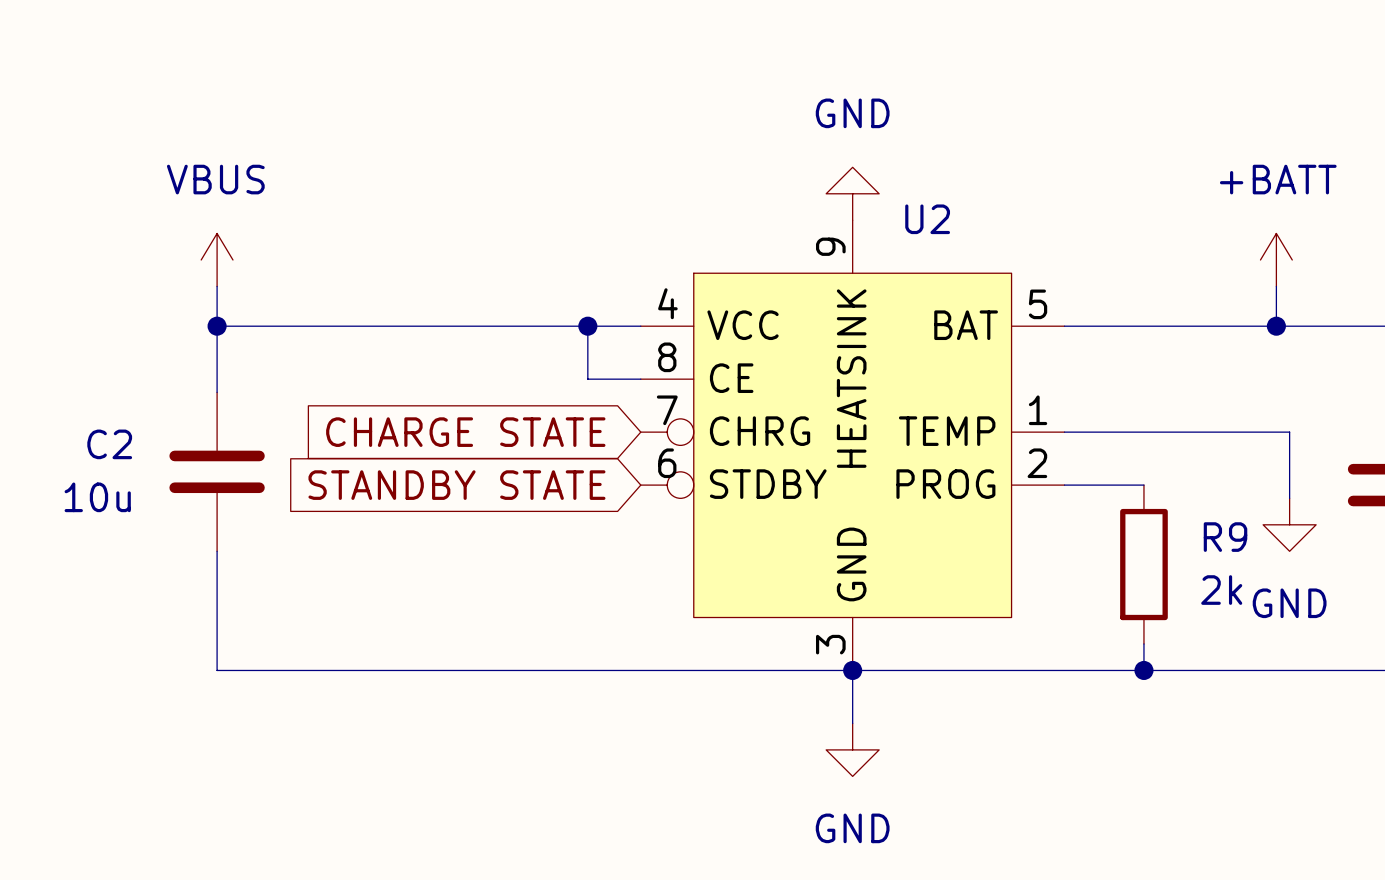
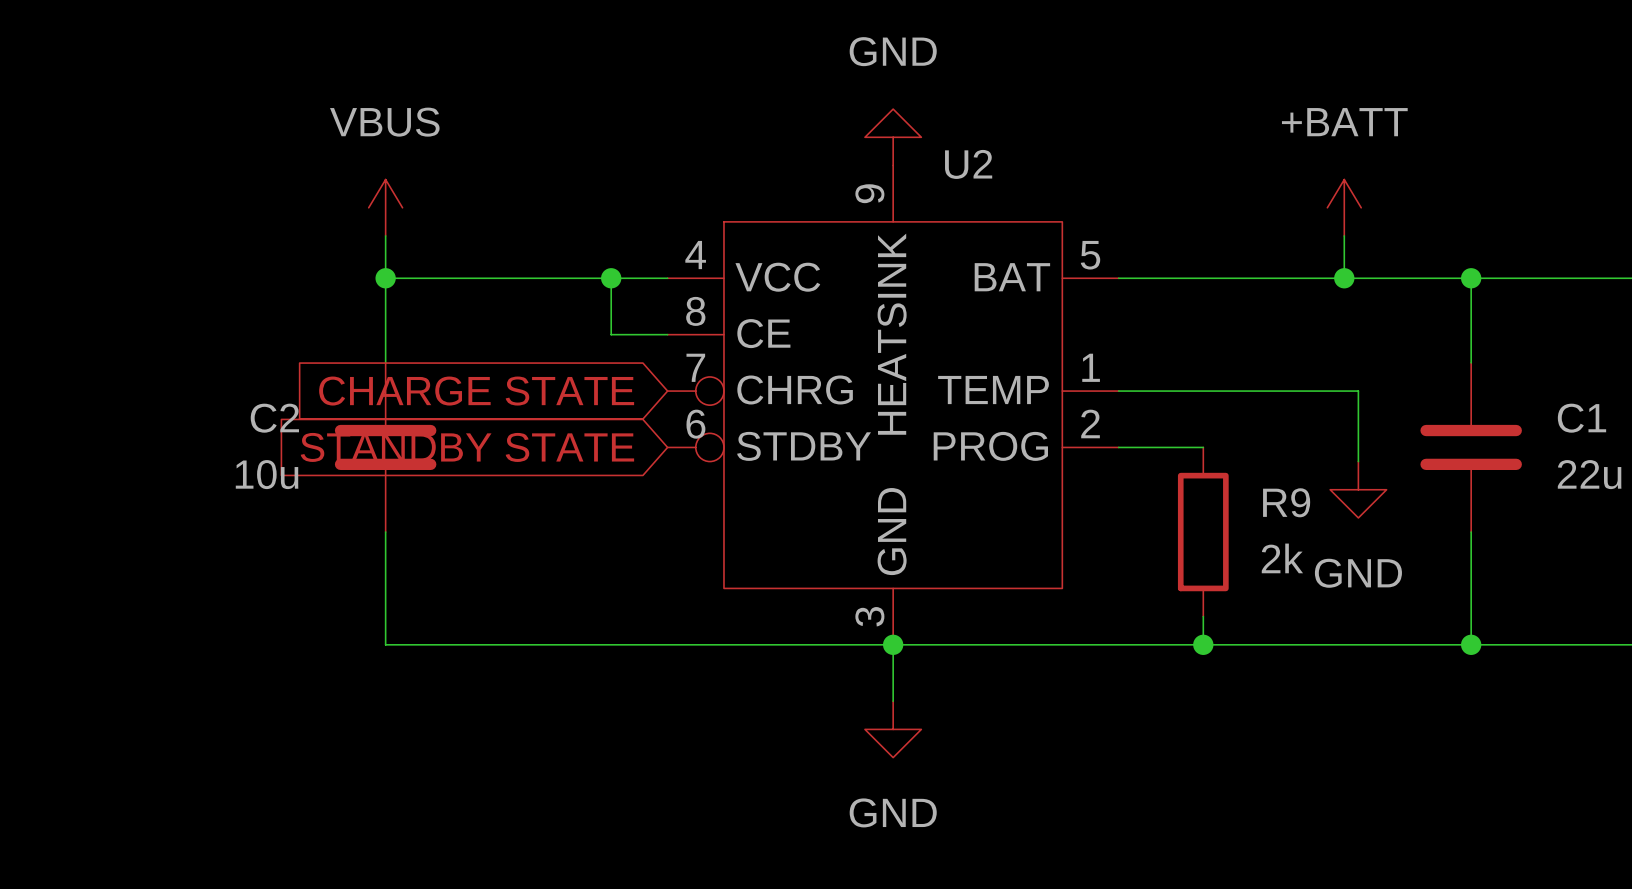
power symbol position: VBUS (217, 259) -> VBUS (385, 207)
wire: (217, 286) (217, 392) -> none
wire: none -> (385, 235) (385, 362)
wire: (217, 326) (375, 326) -> none
junction: (217, 326) -> none
junction: none -> (385, 278)
C2 position: (217, 471) -> (385, 447)
wire: (217, 551) (217, 670) (375, 670) -> (385, 532) (385, 644)

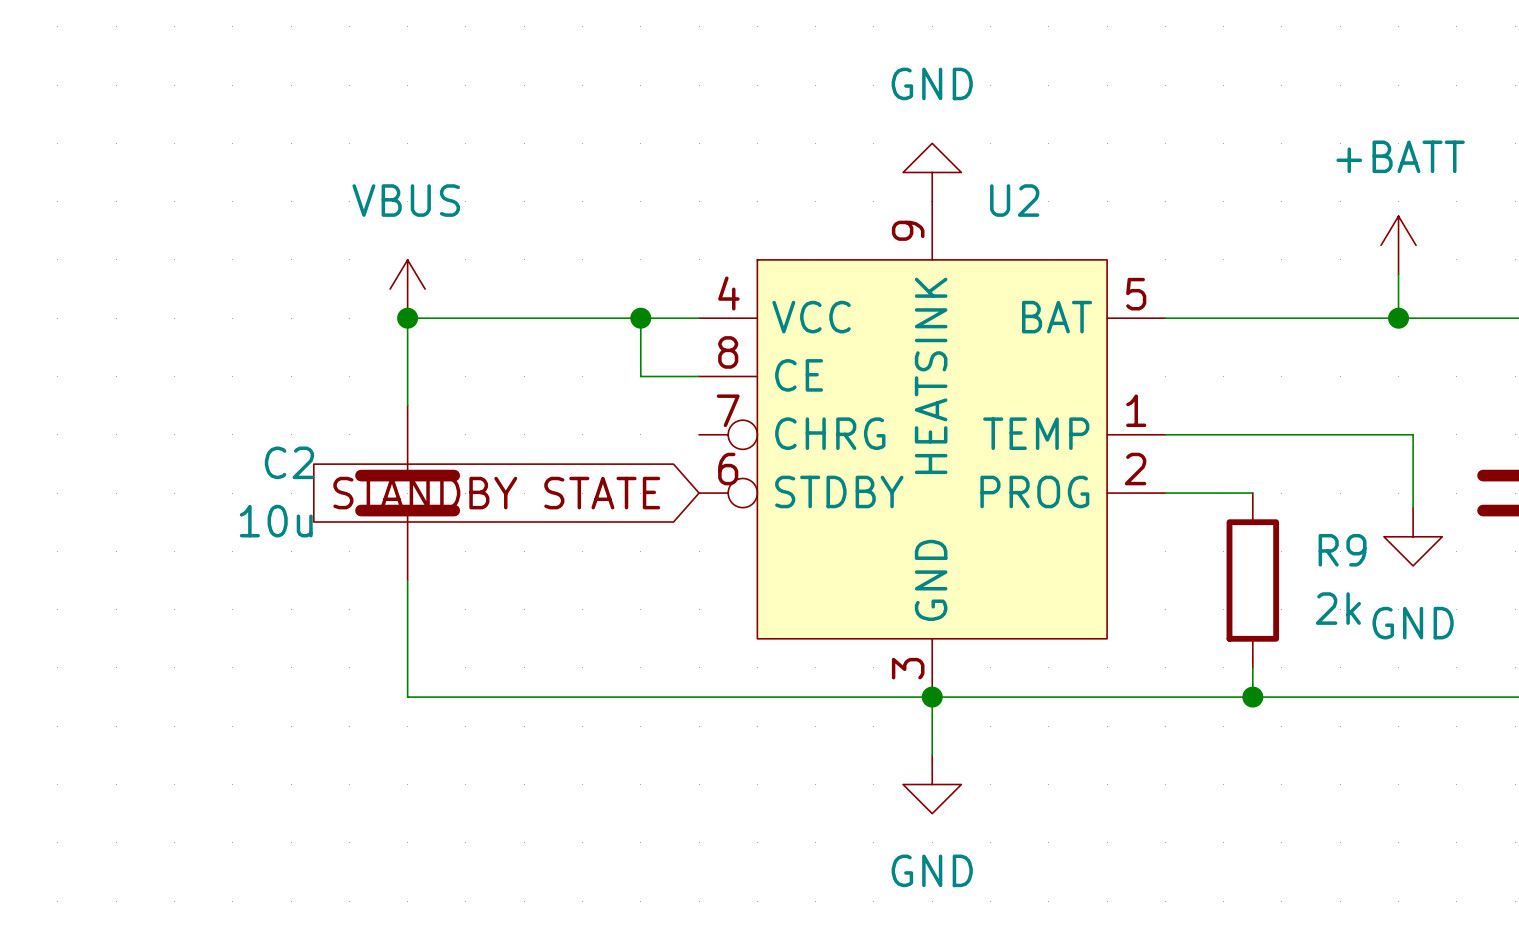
power symbol position: VBUS (385, 207) -> VBUS (407, 289)
global label: CHARGE STATE (476, 391) -> none

